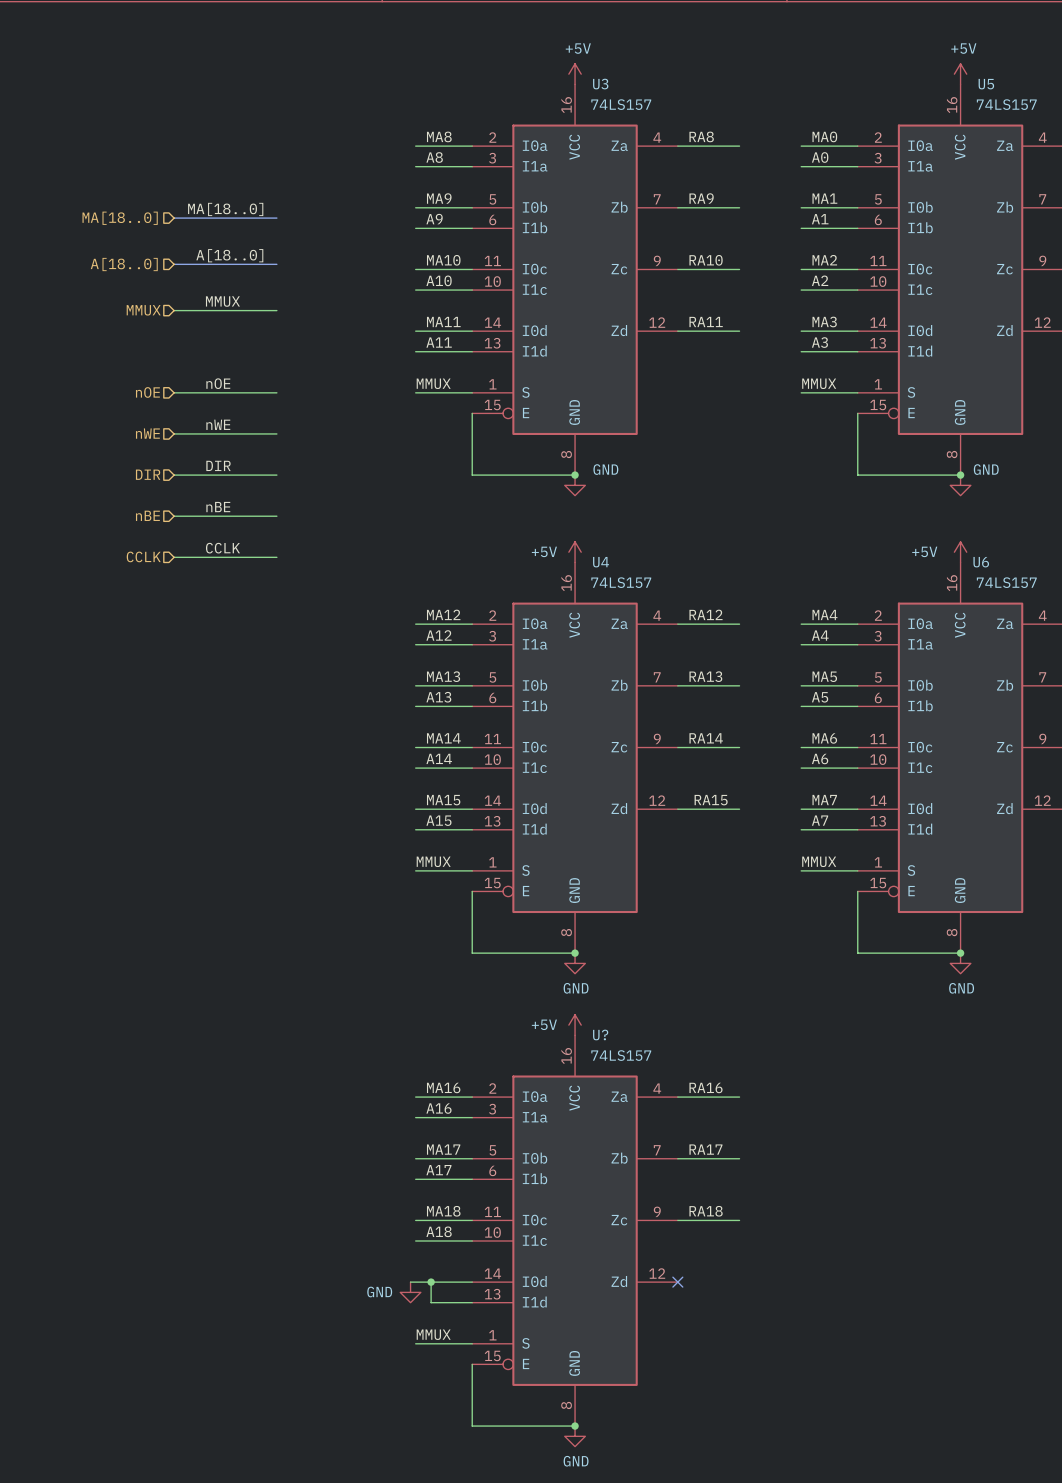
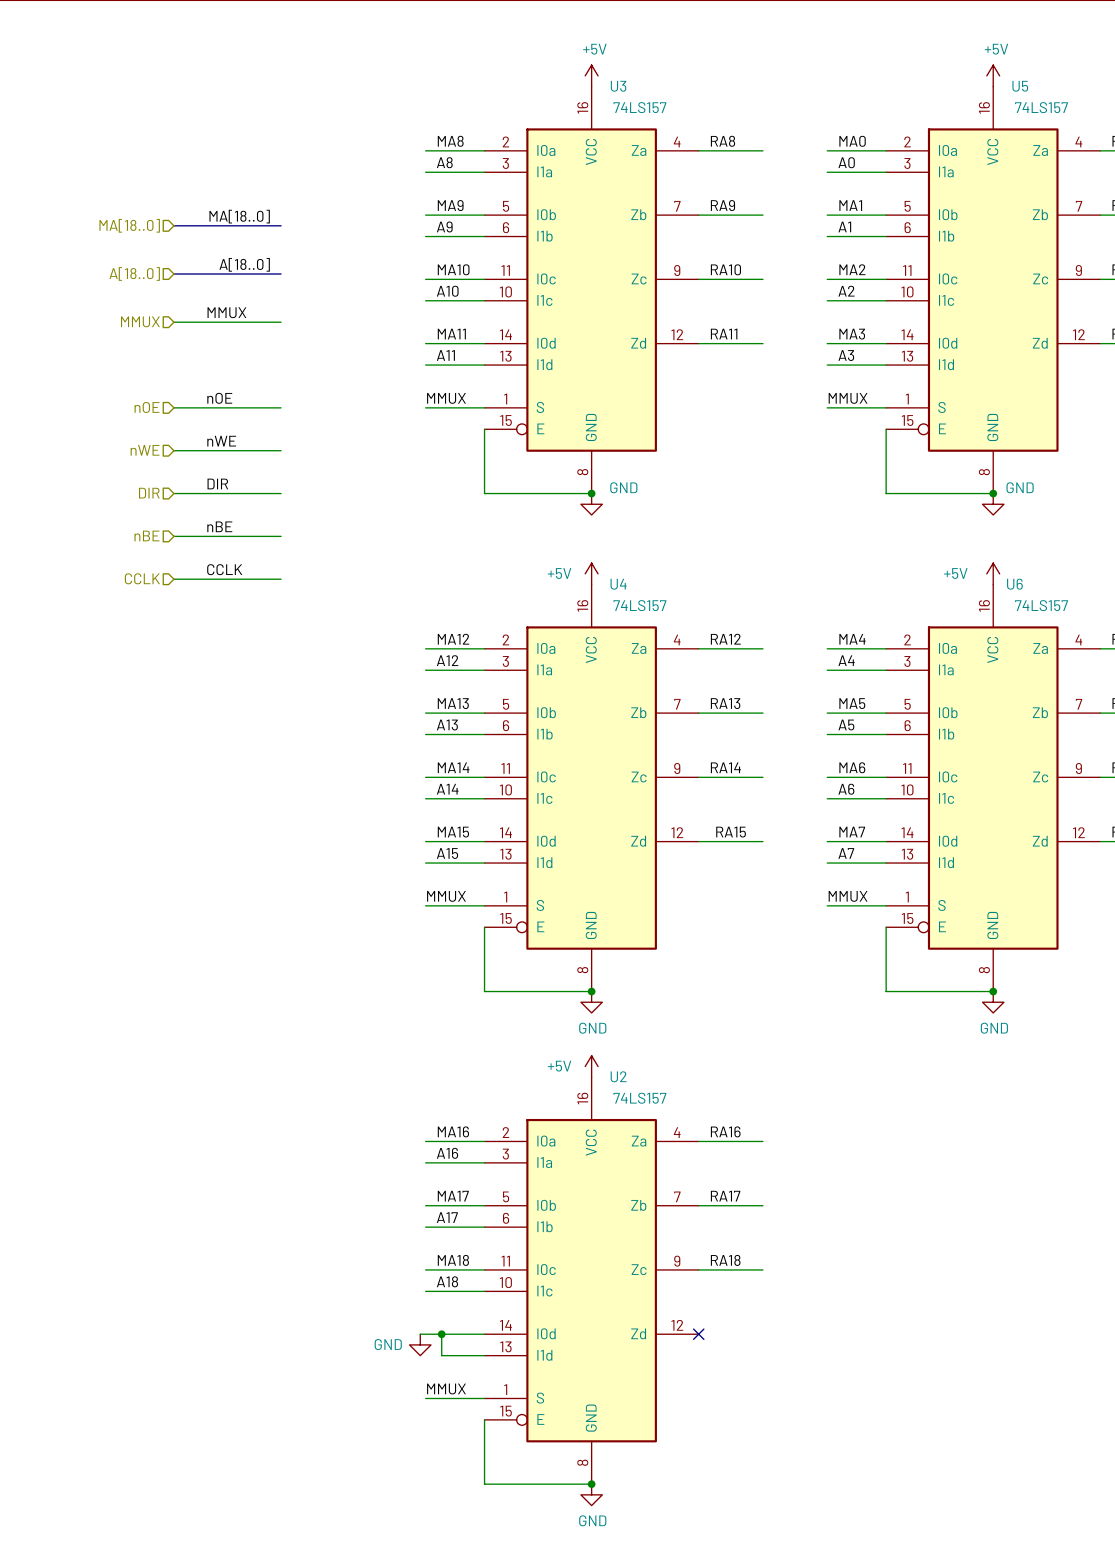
U? name: U? (600, 1035) -> U2 (618, 1076)

